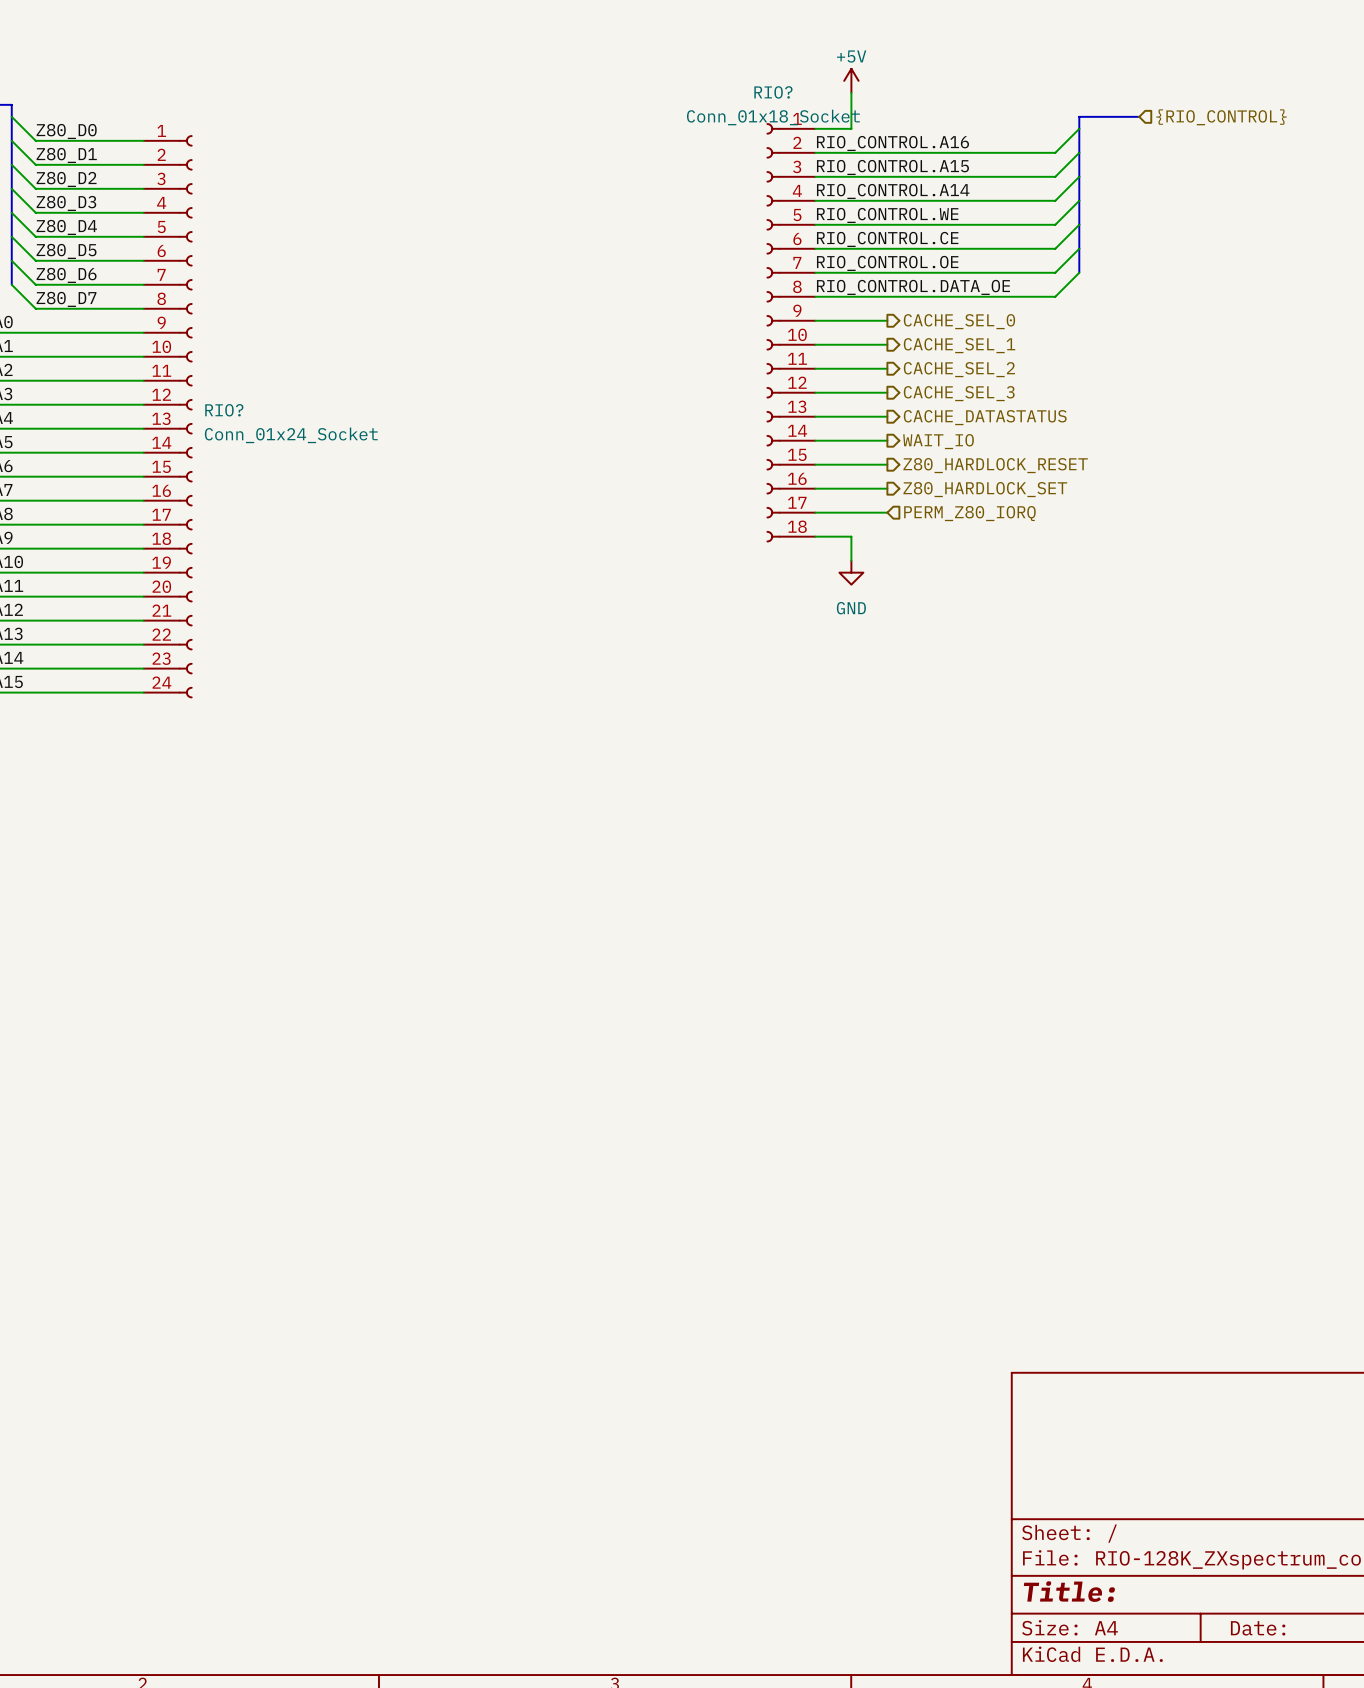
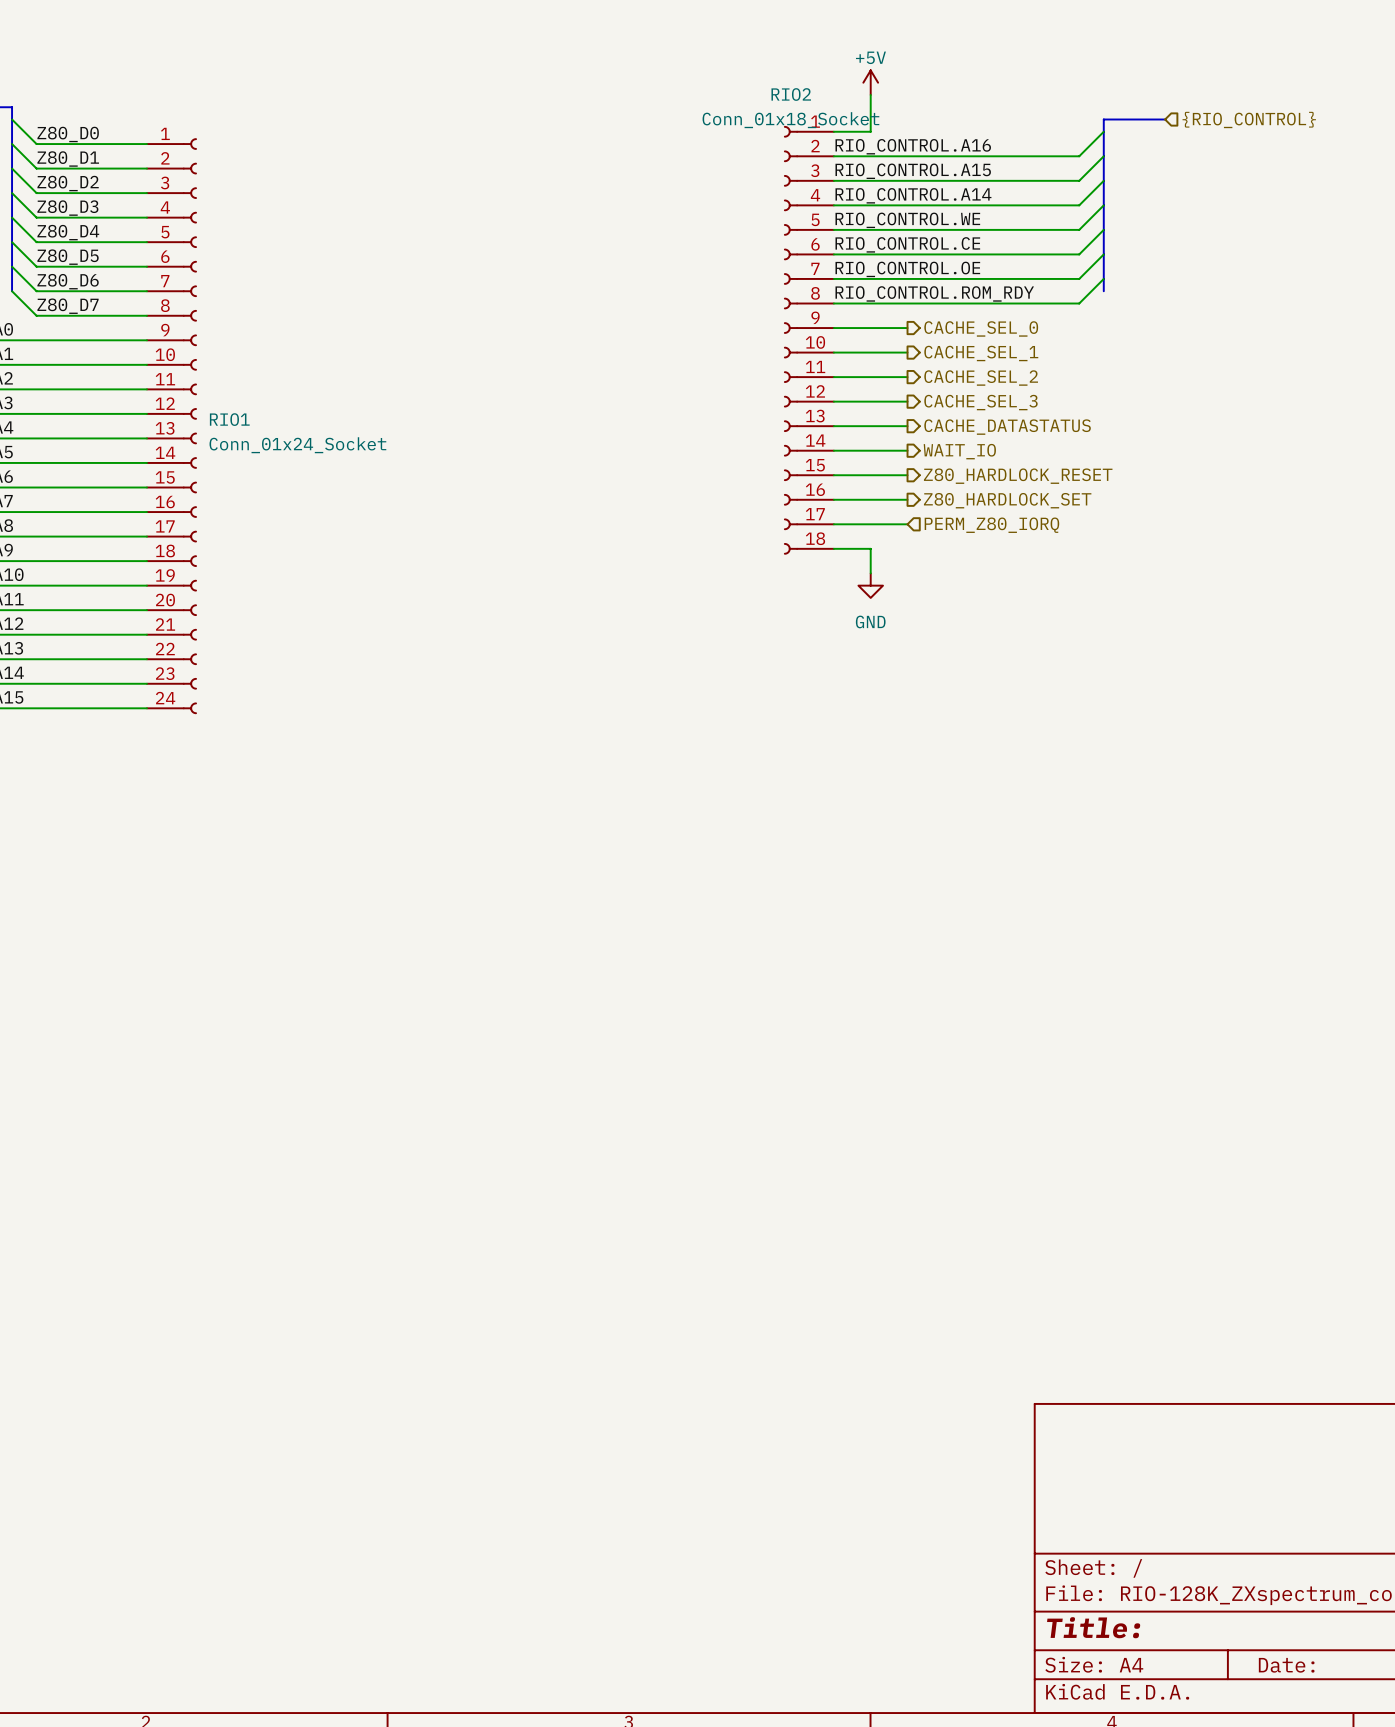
RIO? name: RIO? (773, 92) -> RIO2 (791, 94)
bus: none -> (1103, 278) (1103, 291)
label: RIO_CONTROL.DATA_OE (913, 287) -> RIO_CONTROL.ROM_RDY (934, 293)
RIO? name: RIO? (224, 410) -> RIO1 (229, 419)

